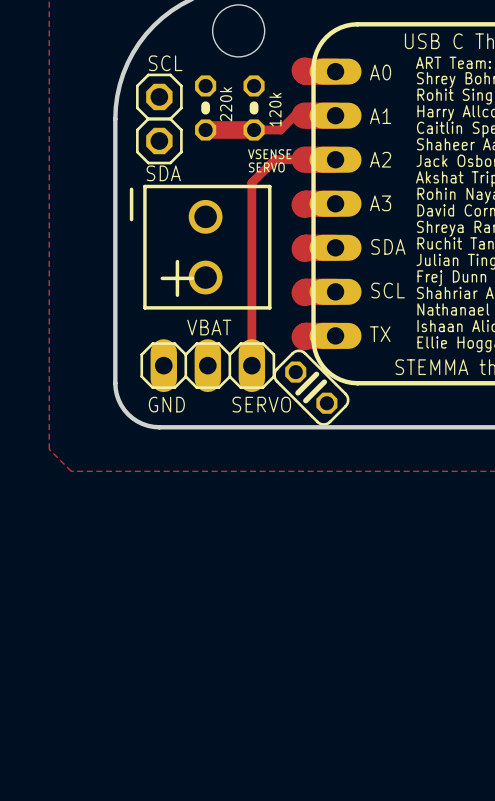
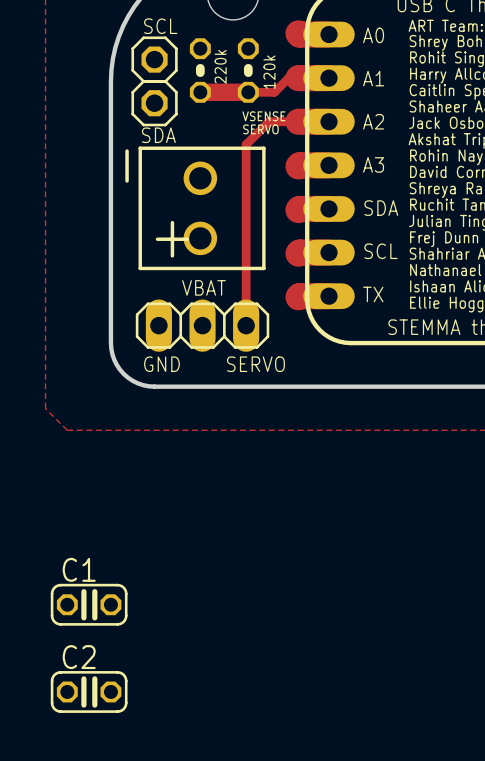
part: (311, 387) -> none
C1: none -> (89, 604)
C2: none -> (89, 691)

